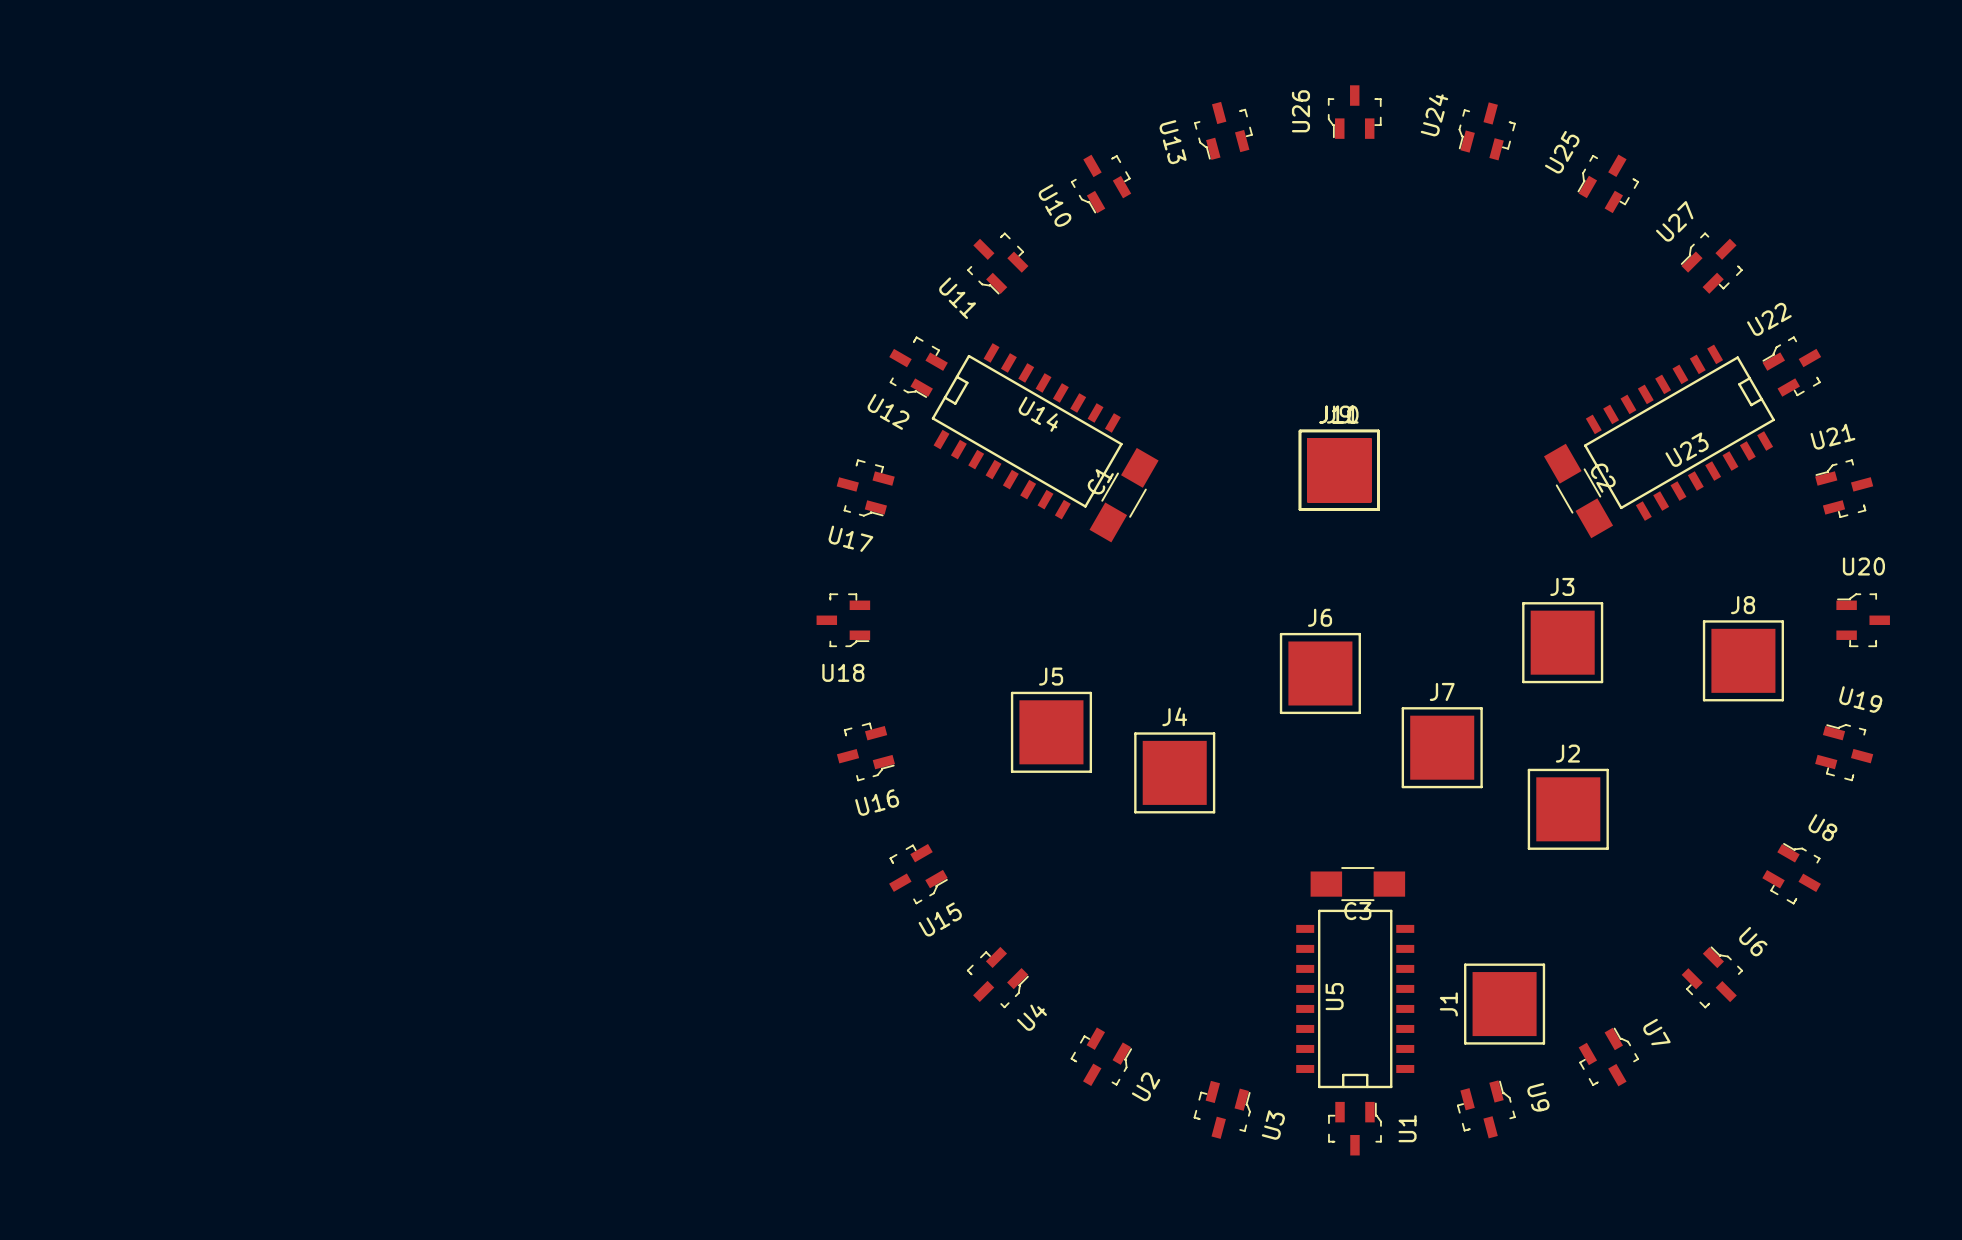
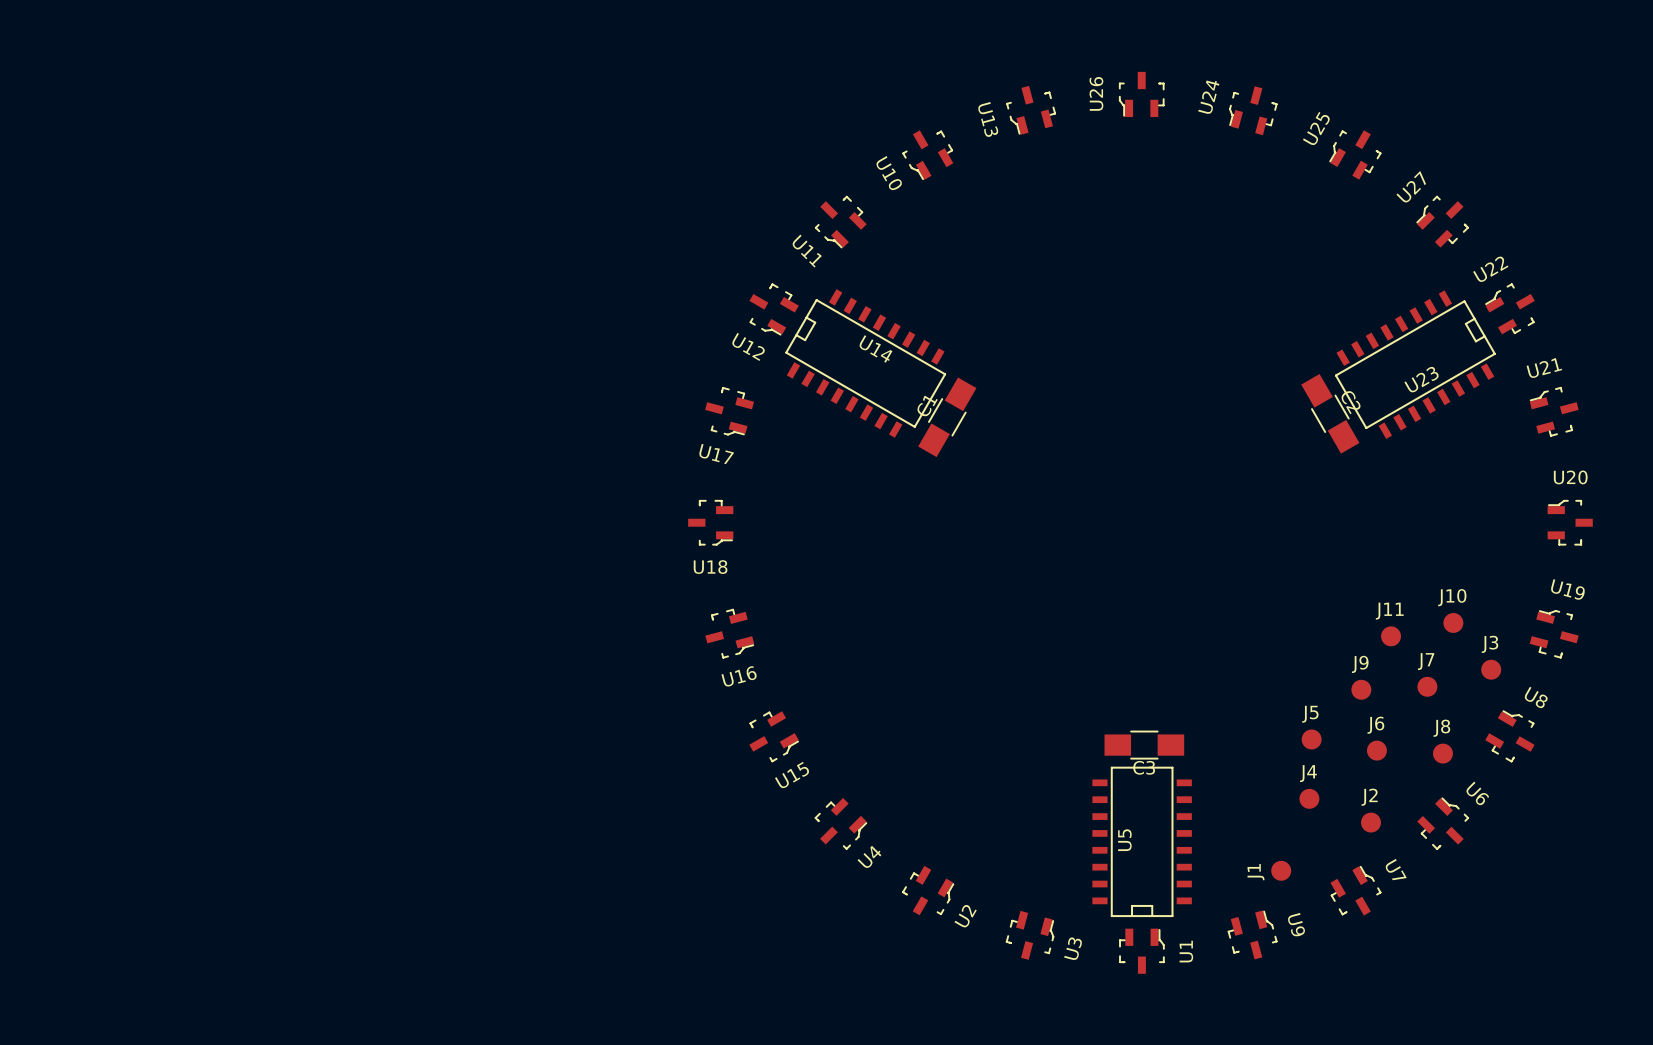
J9 footprint: [1298, 429, 1380, 511] -> [1351, 679, 1372, 700]
J10 footprint: [1298, 429, 1380, 511] -> [1443, 613, 1464, 633]
J11 footprint: [1298, 429, 1380, 511] -> [1381, 626, 1402, 647]
J3 footprint: [1522, 602, 1604, 684] -> [1481, 659, 1502, 680]
J8 footprint: [1702, 620, 1784, 702] -> [1433, 743, 1453, 764]
J6 footprint: [1279, 632, 1361, 715] -> [1366, 740, 1387, 761]
J5 footprint: [1010, 691, 1093, 773] -> [1301, 729, 1322, 750]
J7 footprint: [1401, 707, 1483, 789] -> [1417, 676, 1438, 697]
J4 footprint: [1134, 732, 1216, 814] -> [1299, 788, 1320, 809]
J2 footprint: [1527, 768, 1609, 850] -> [1361, 812, 1381, 833]
J1 footprint: [1464, 963, 1546, 1045] -> [1271, 860, 1292, 881]

